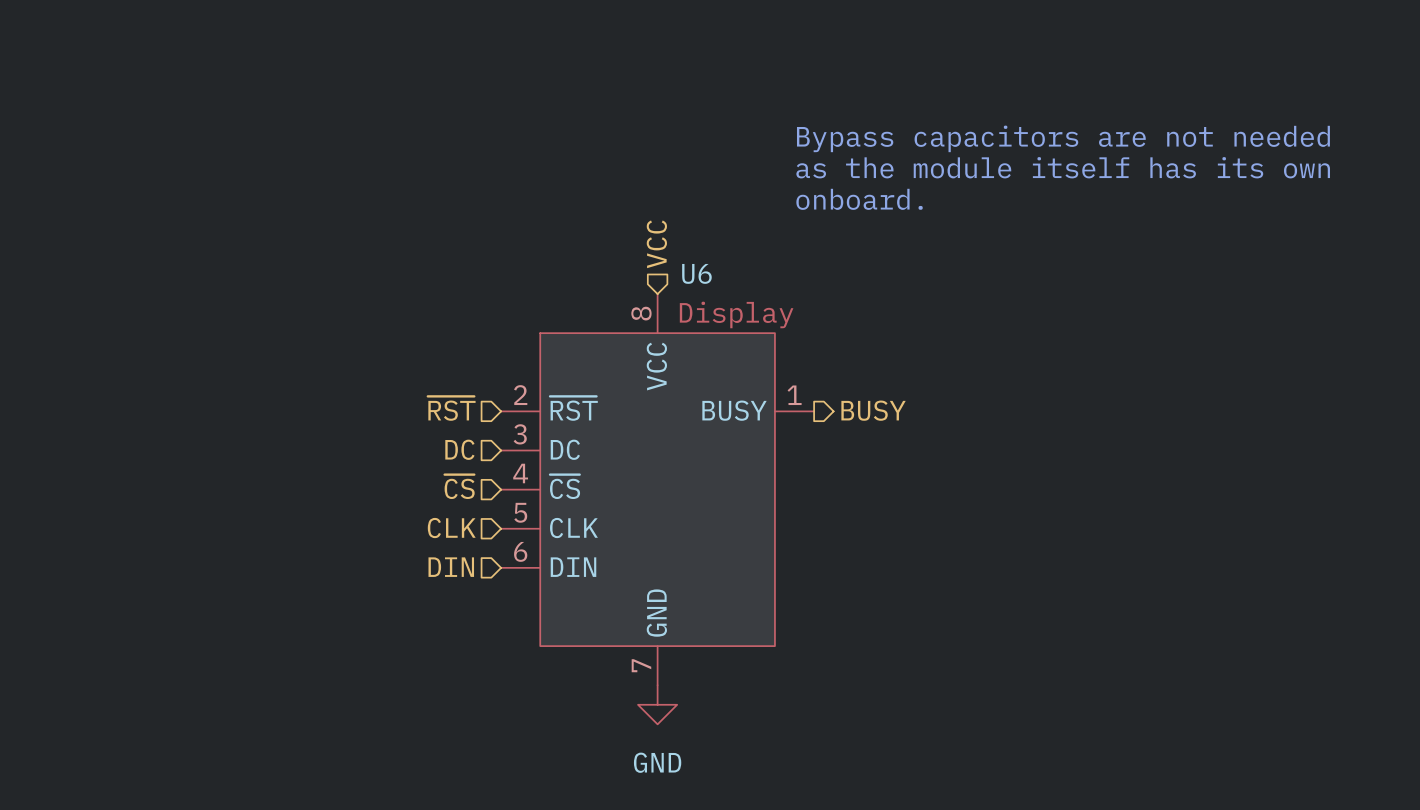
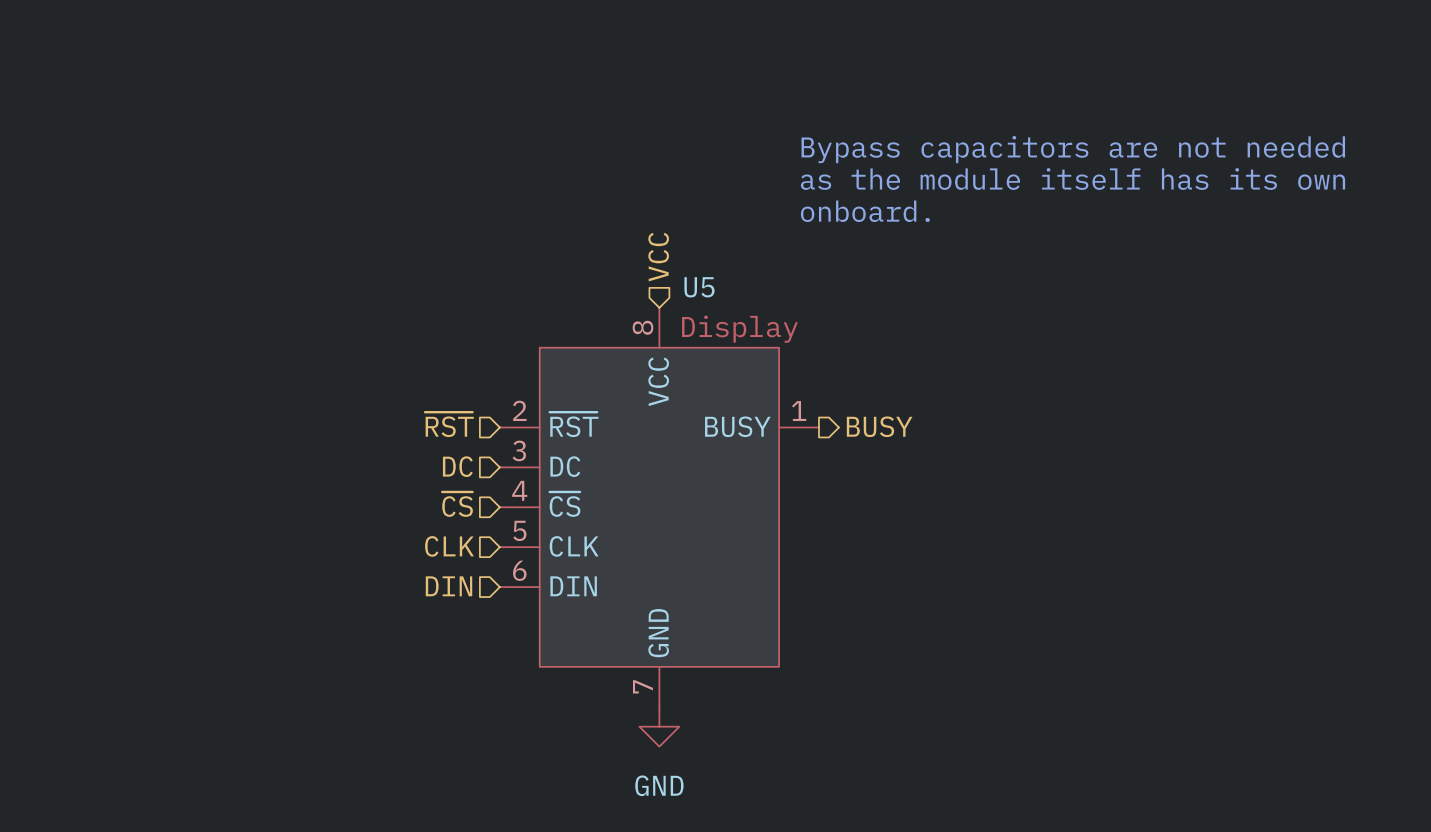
U6 name: U6 (696, 273) -> U5 (699, 287)

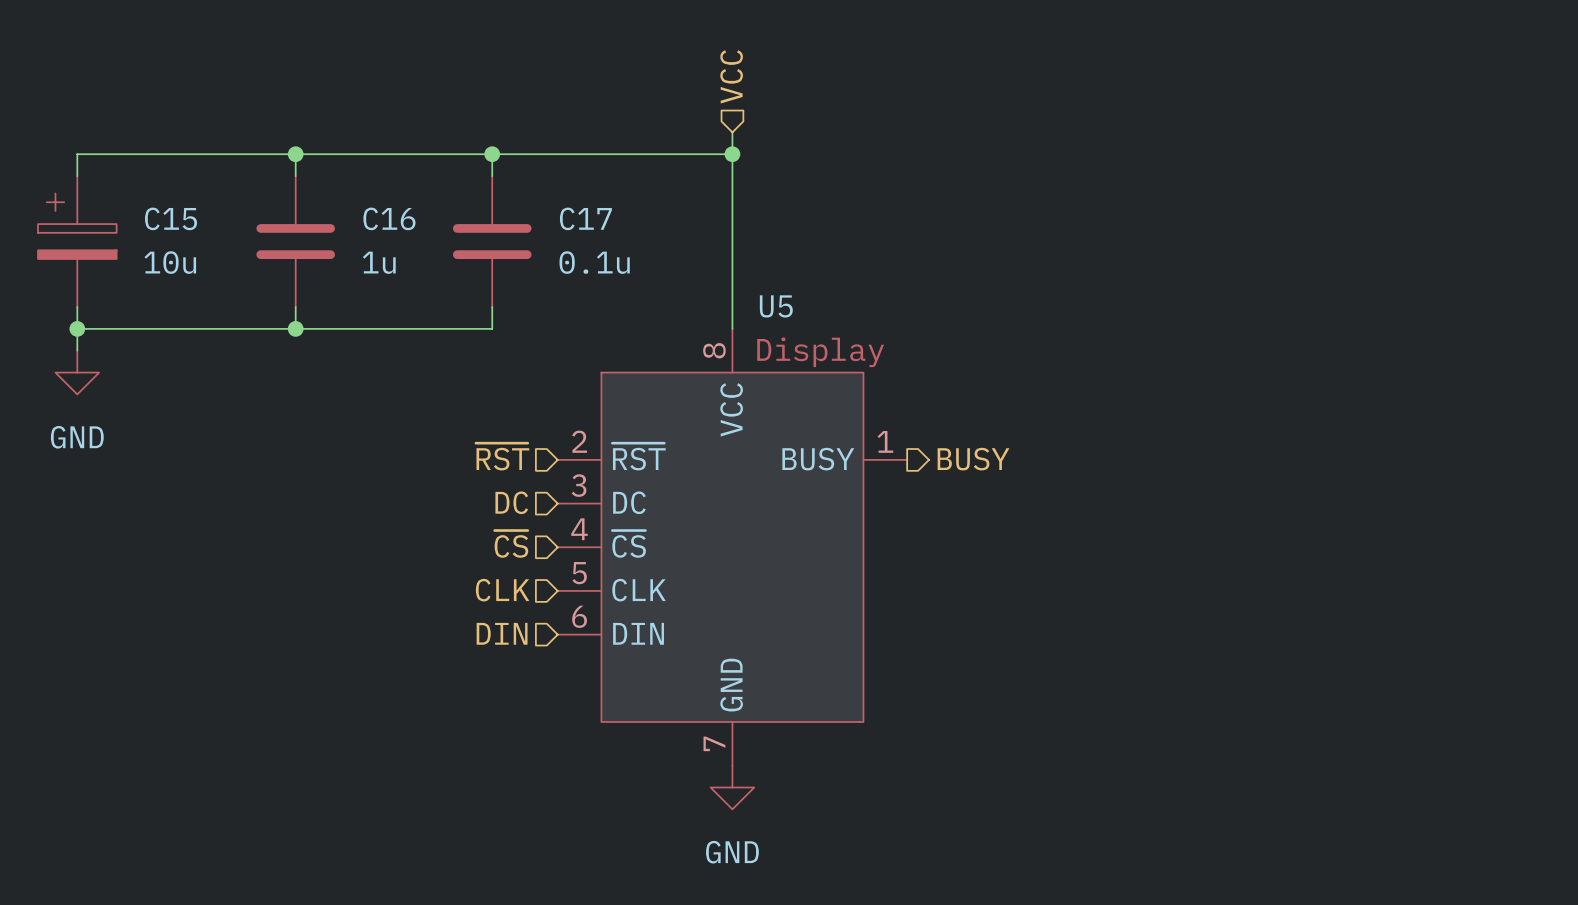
wire: none -> (732, 132) (732, 328)
wire: none -> (295, 154) (295, 176)
junction: none -> (295, 154)
wire: none -> (492, 154) (492, 176)
junction: none -> (492, 154)
wire: none -> (732, 154) (77, 154) (77, 176)
junction: none -> (732, 154)
text: Bypass capacitors are not needed (1073, 149) -> none
text: as the module itself has its own (1073, 179) -> none
text: onboard. (865, 211) -> none
C15: none -> 10u (77, 241)
C16: none -> 1u (295, 241)
C17: none -> 0.1u (492, 241)
hierarchical label position: VCC (658, 257) -> VCC (731, 76)
wire: none -> (77, 307) (77, 350)
wire: none -> (295, 307) (295, 328)
wire: none -> (492, 307) (492, 328) (77, 328)
junction: none -> (77, 328)
junction: none -> (295, 328)
power symbol: none -> GND (77, 372)

